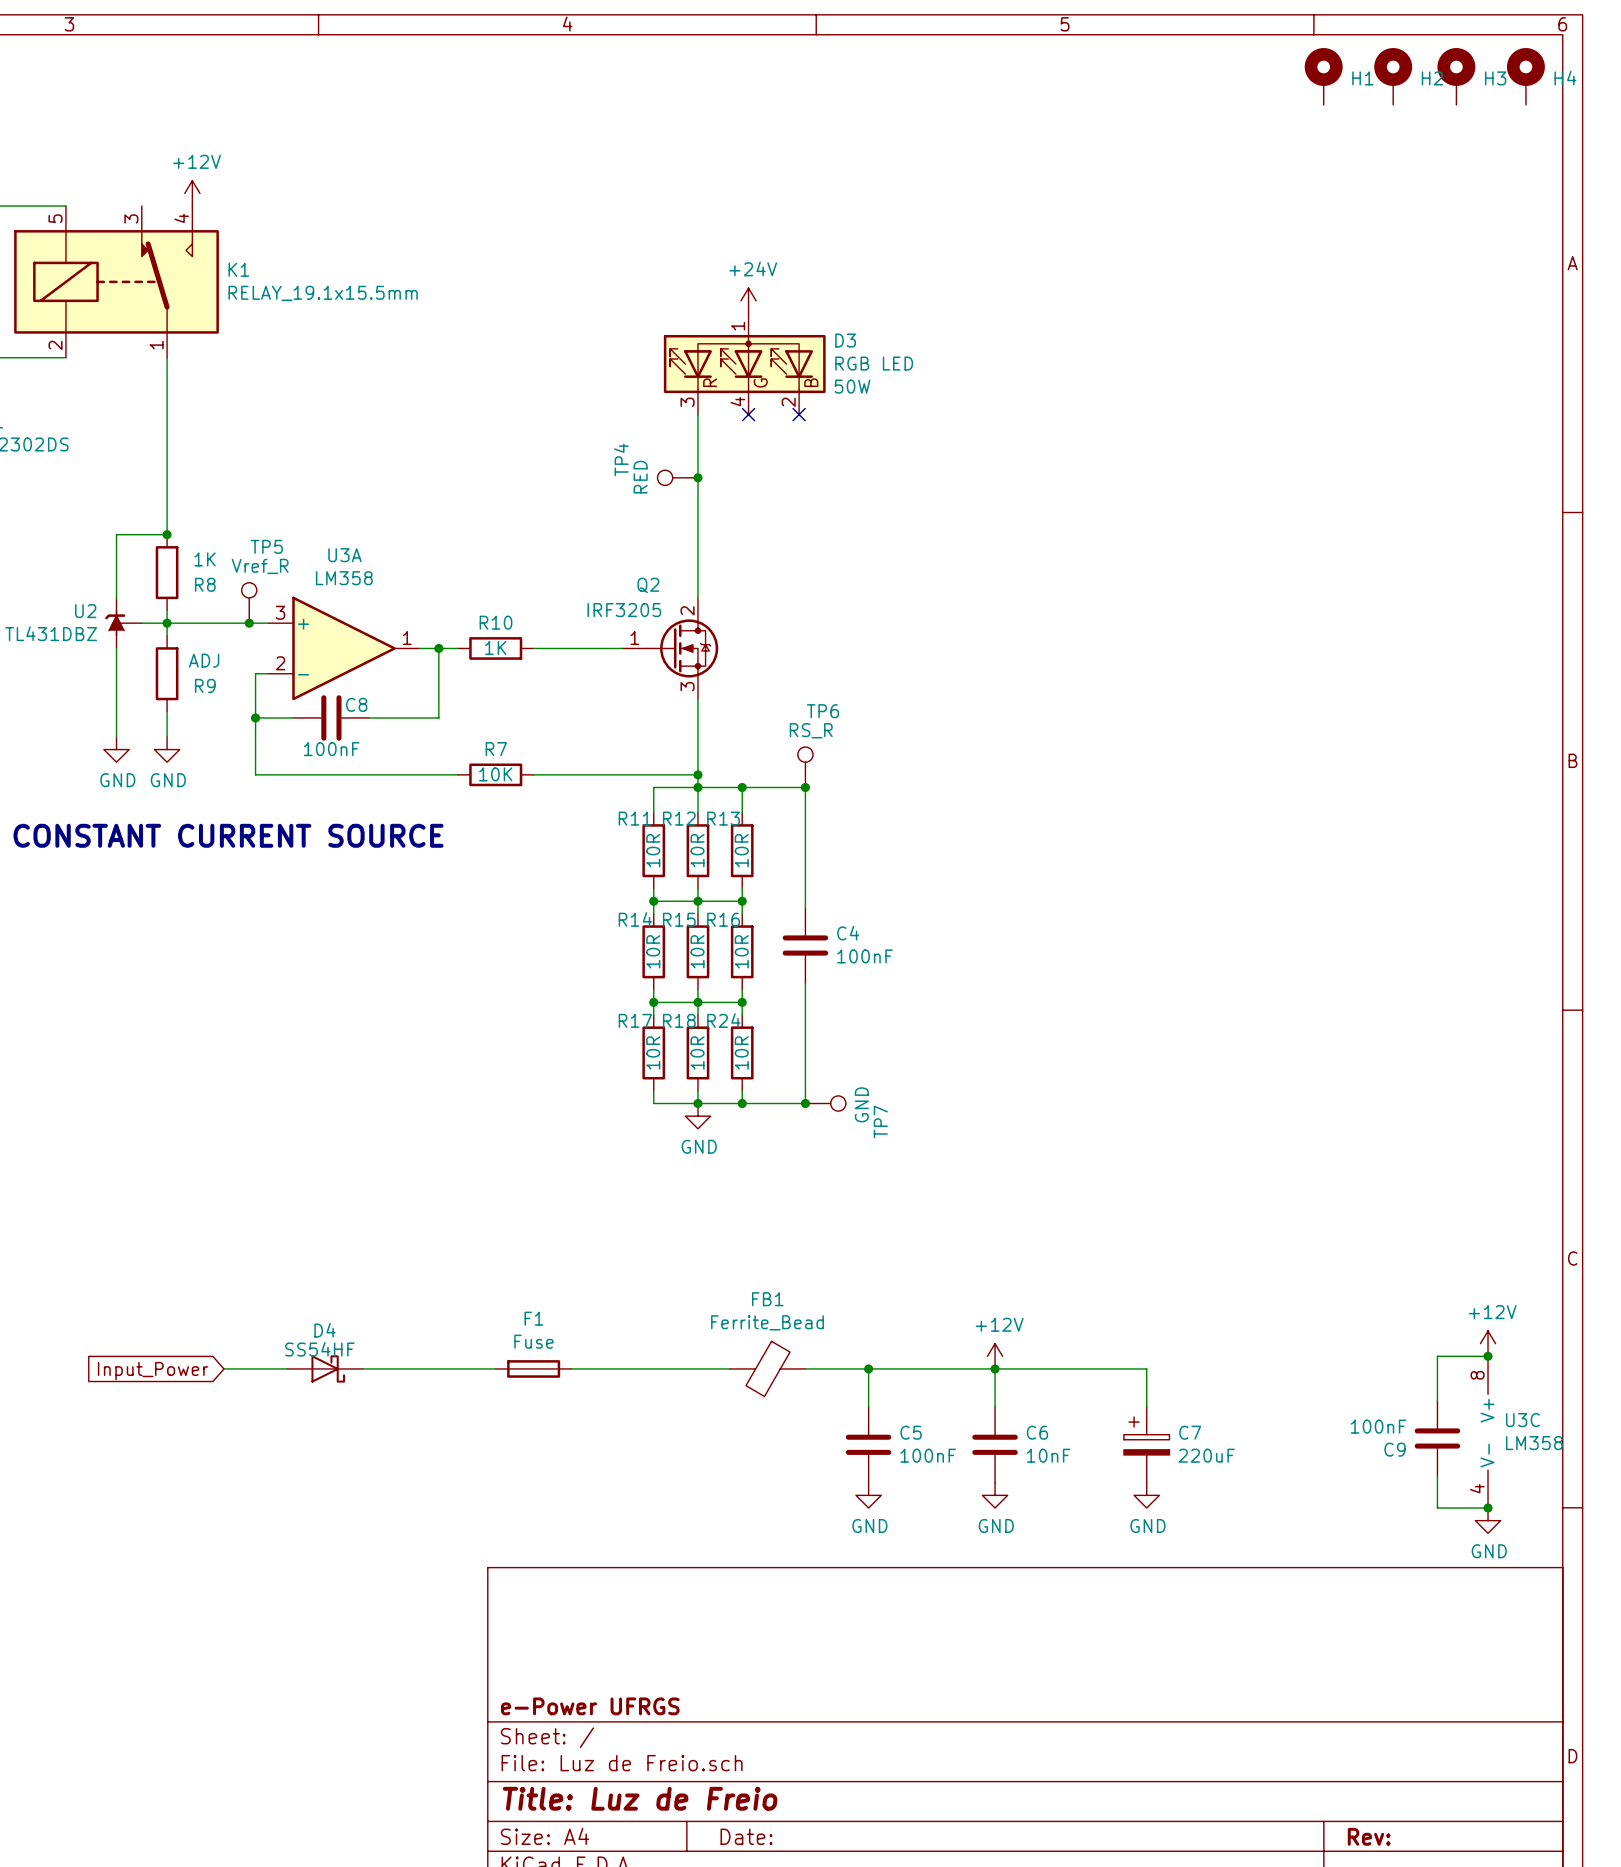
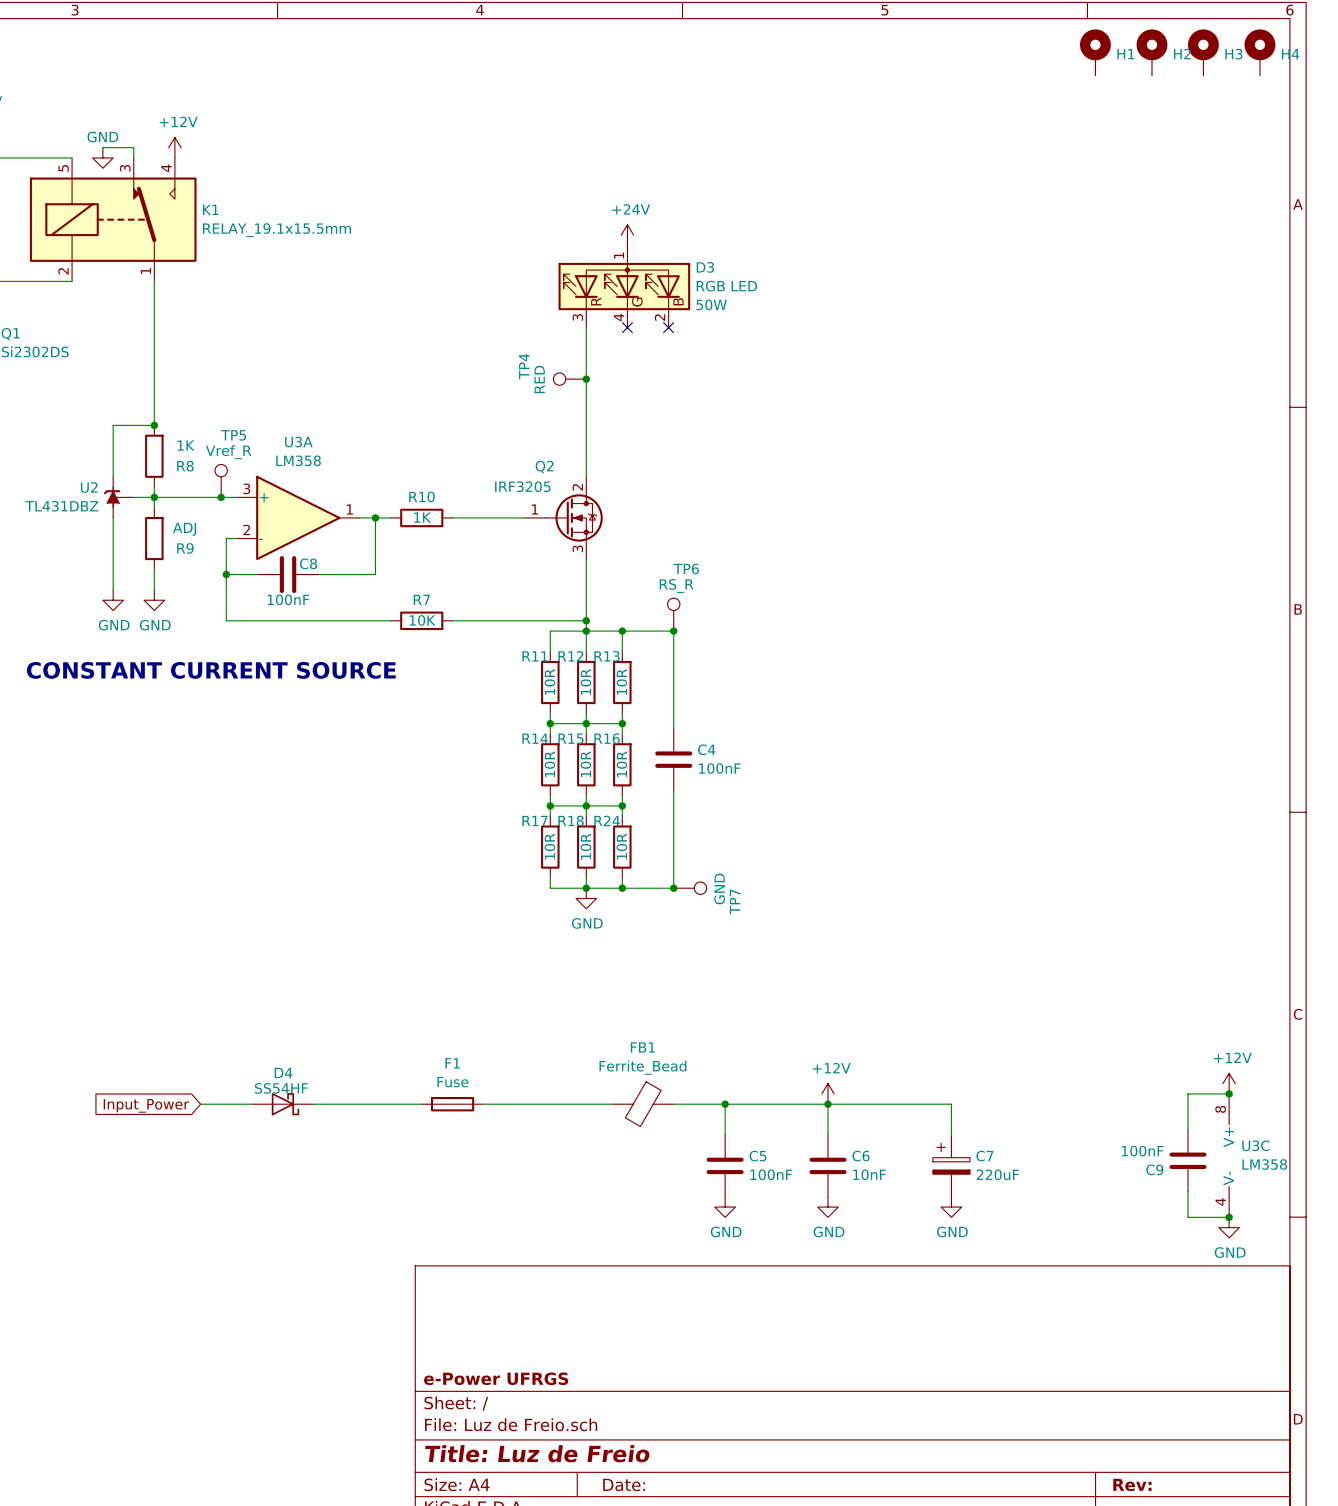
wire: none -> (102, 147) (133, 147) (133, 157)
power symbol: none -> GND (102, 157)

